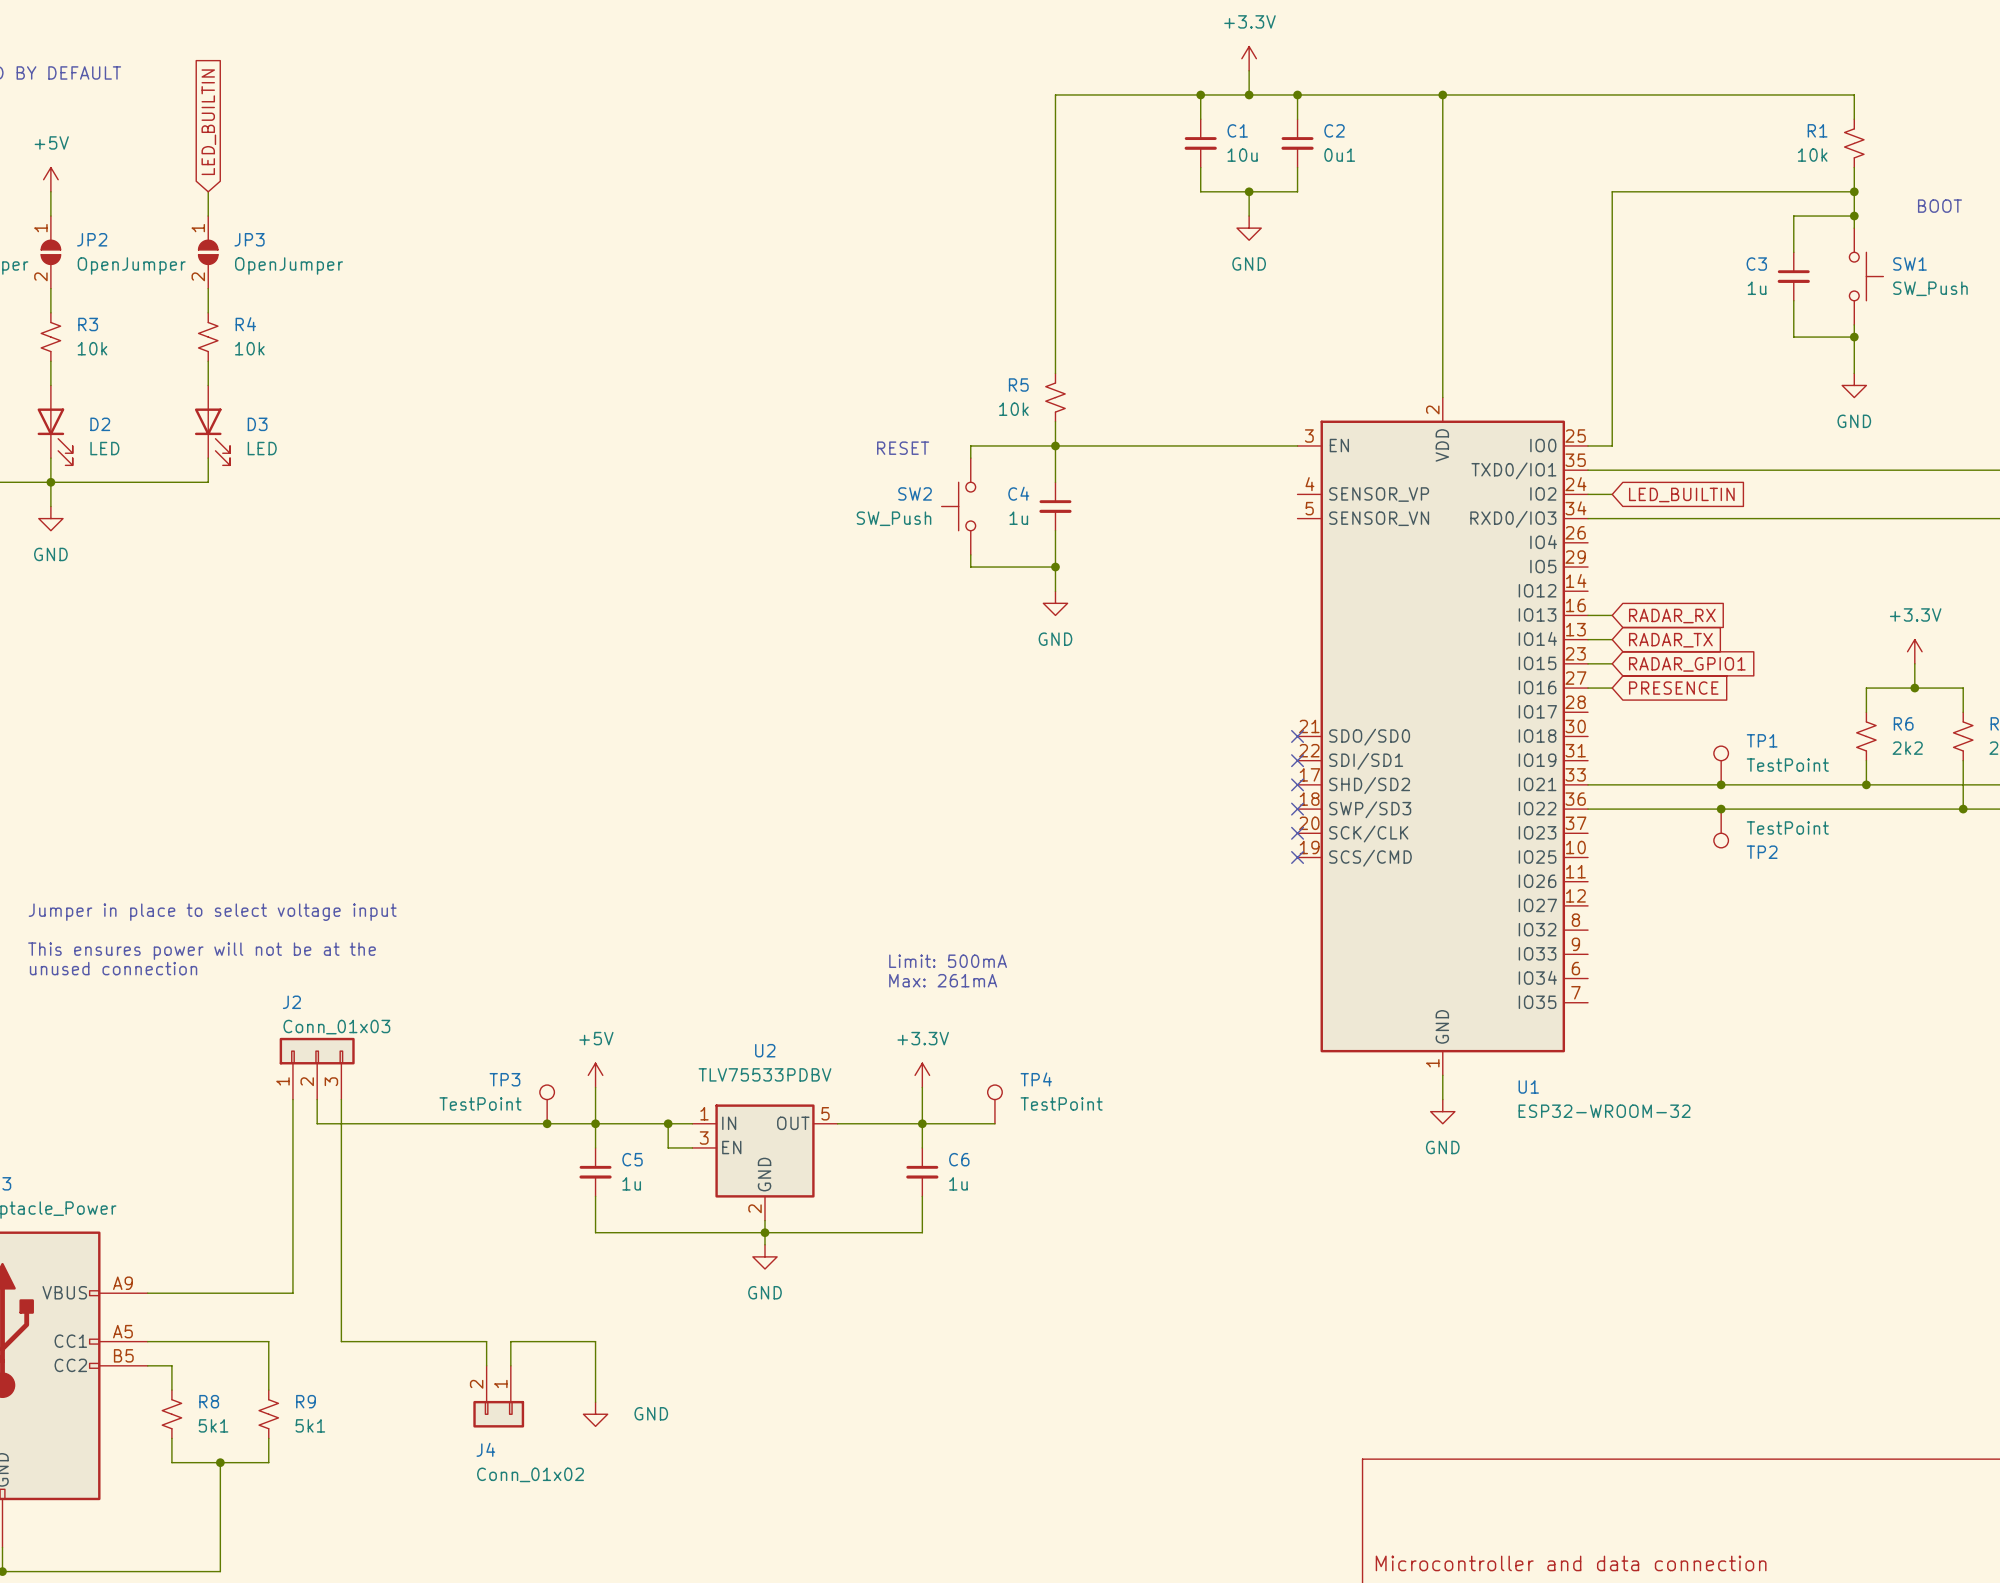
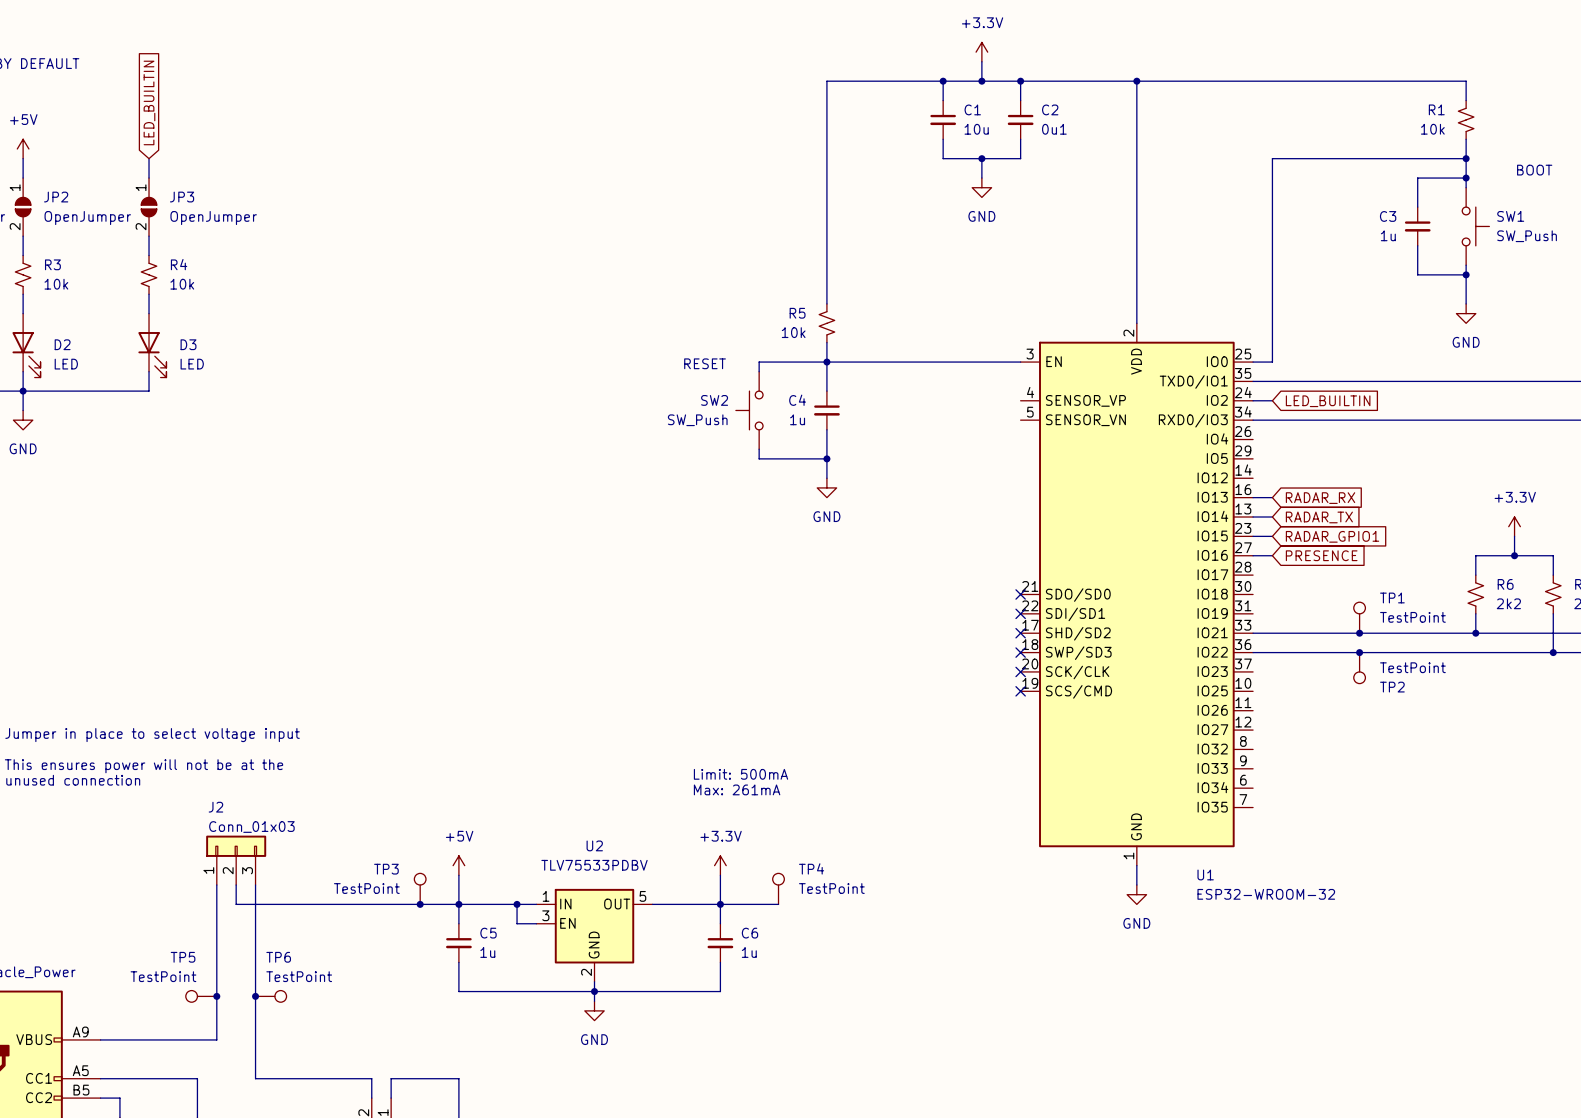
TP5: none -> TestPoint (201, 996)
junction: none -> (216, 996)
junction: none -> (255, 996)
TP6: none -> TestPoint (271, 996)

